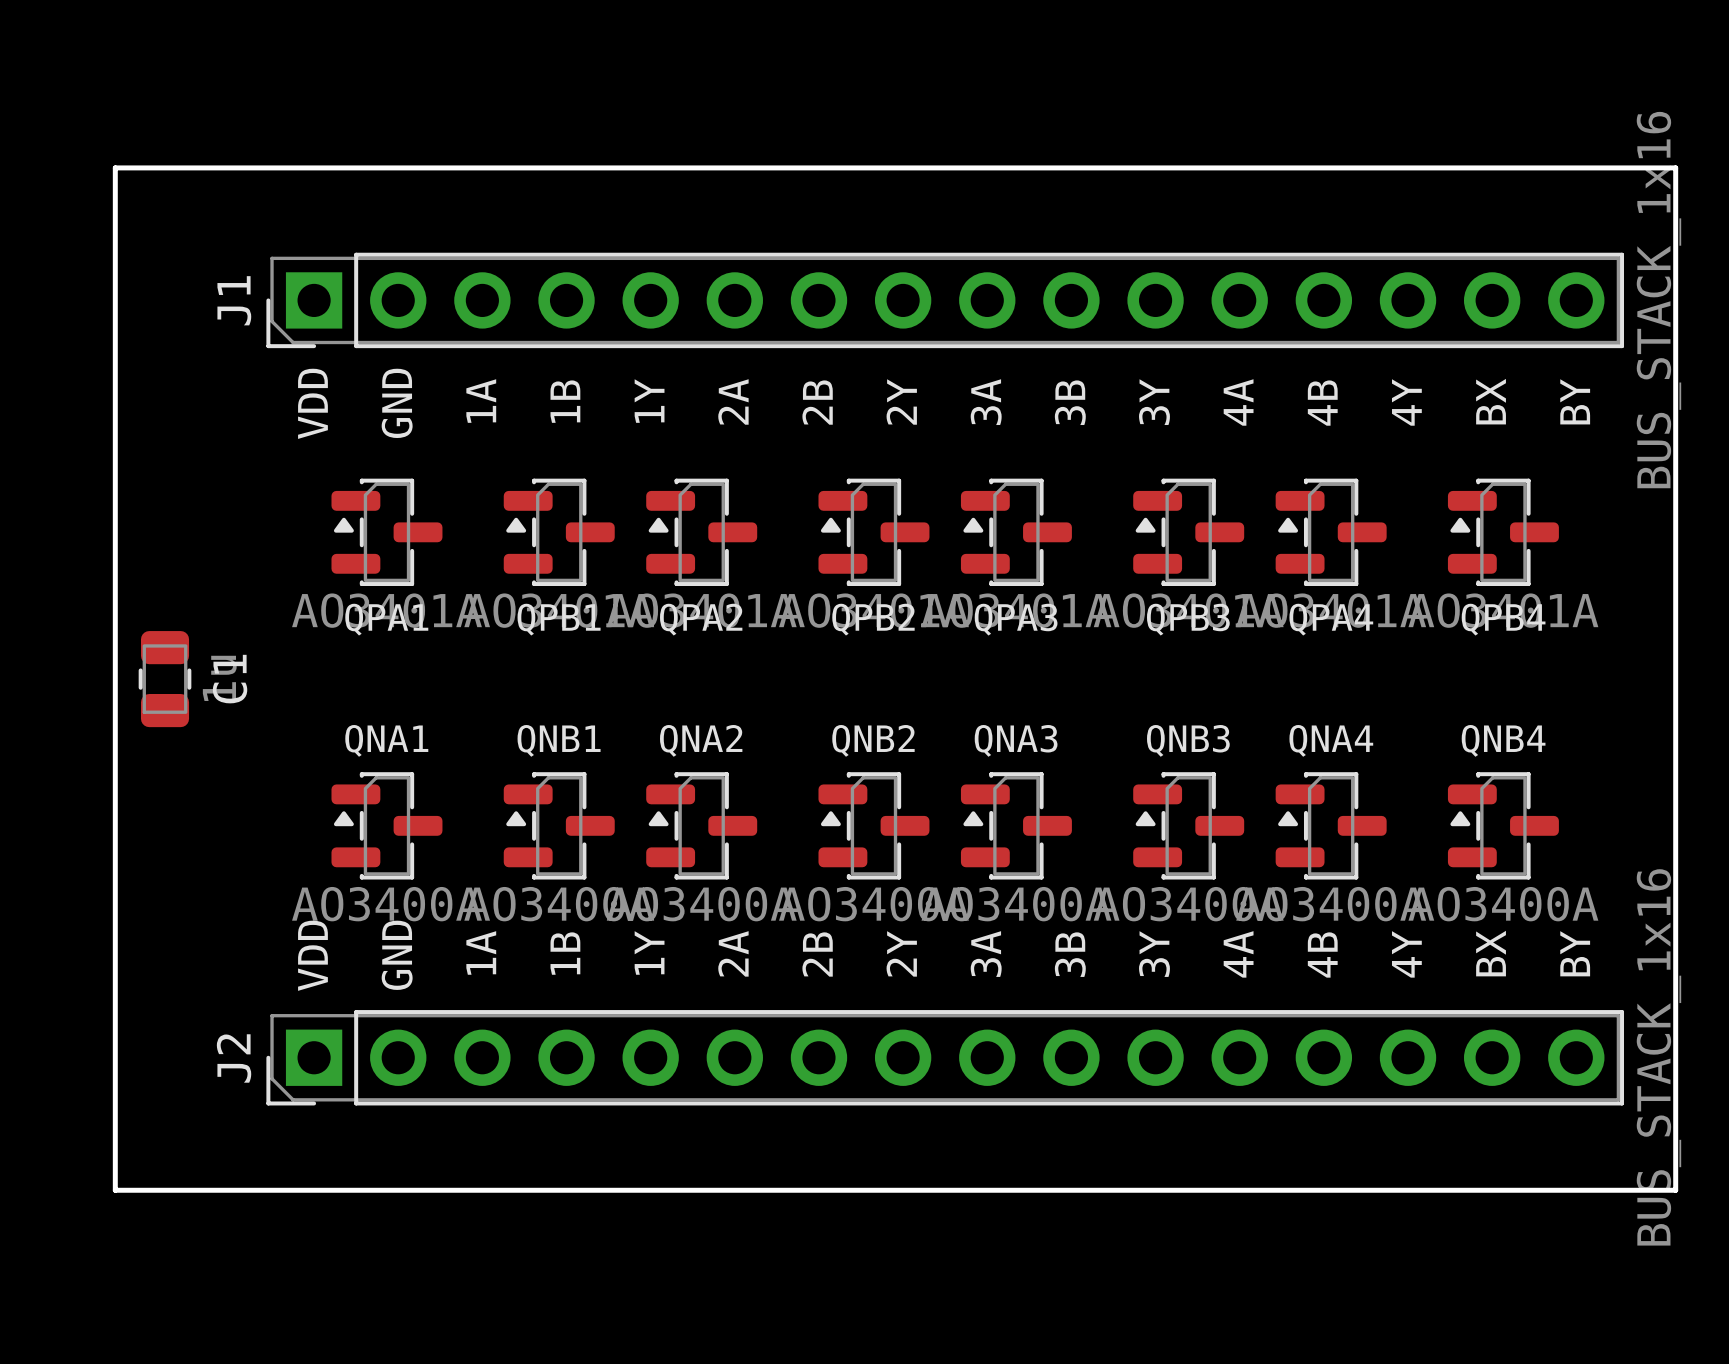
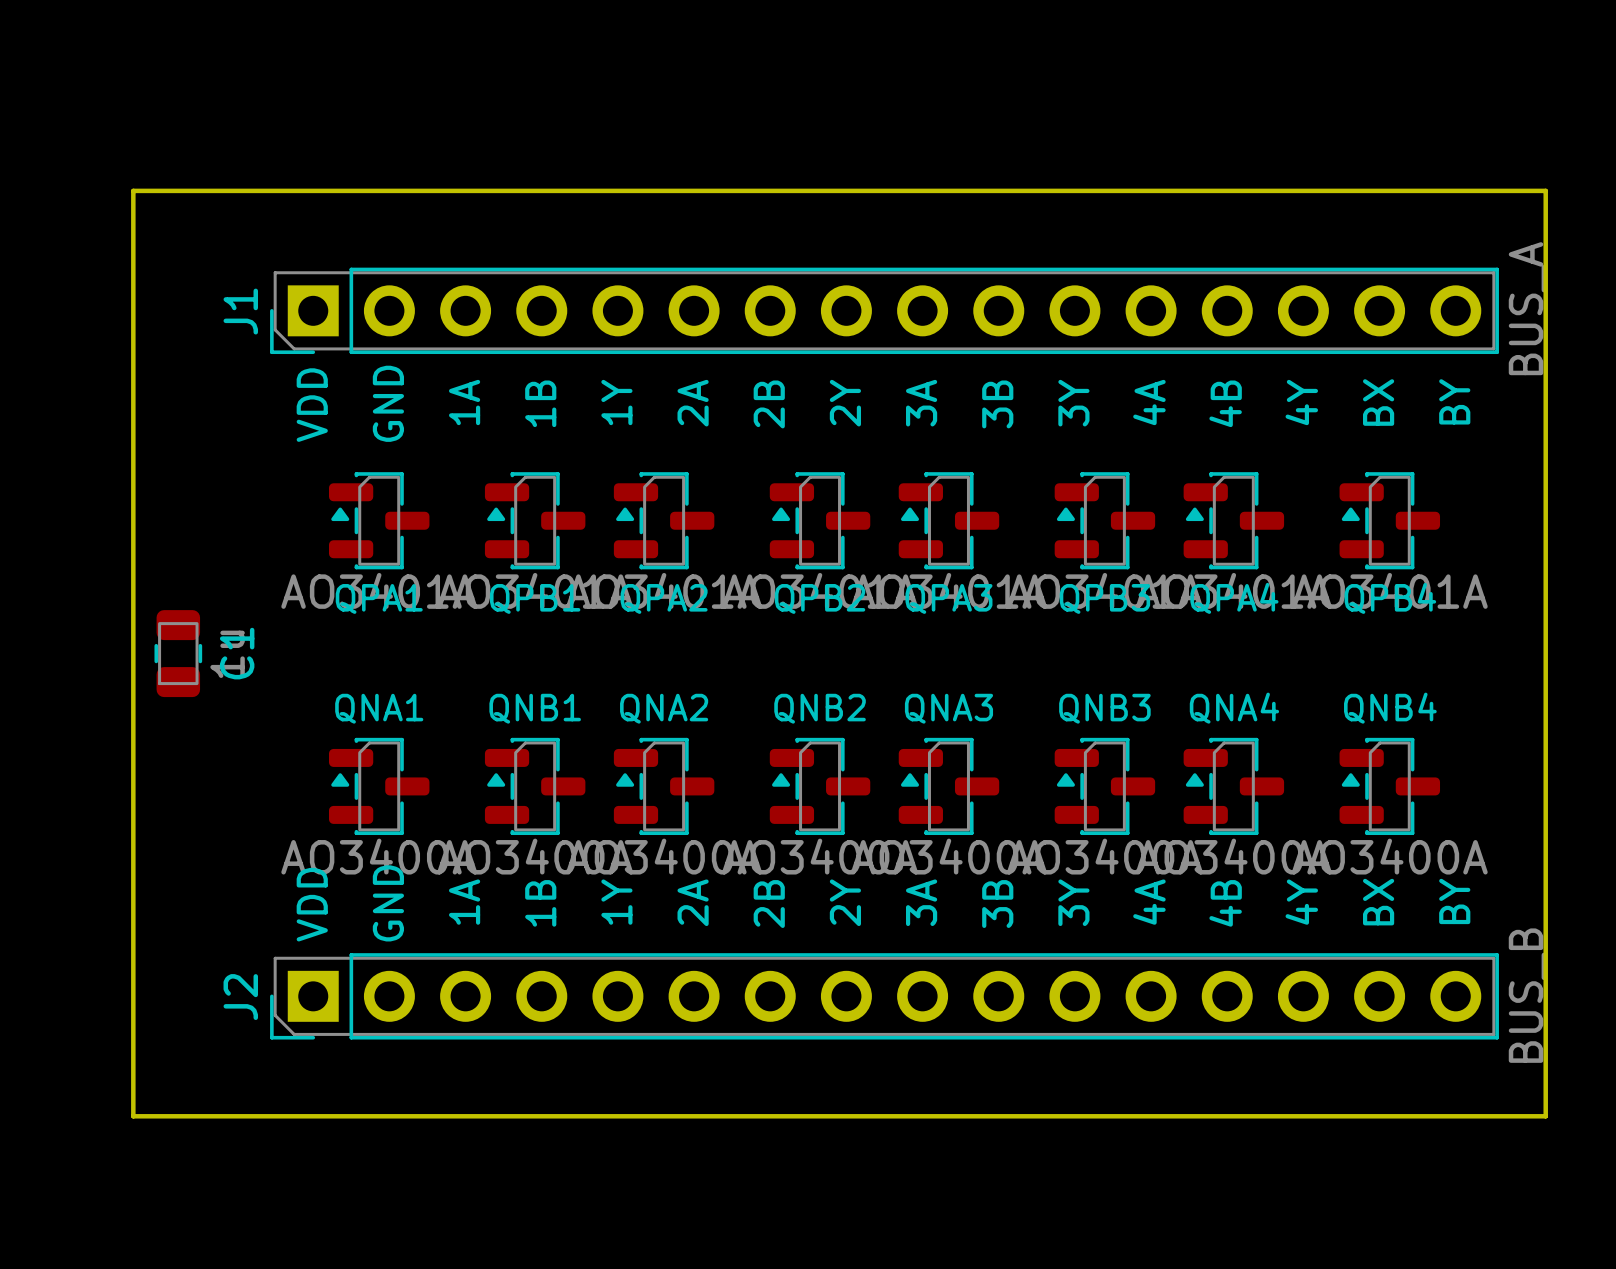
J1 value: BUS_STACK_1x16 (1658, 300) -> BUS_A (1527, 308)
J2 value: BUS_STACK_1x16 (1658, 1057) -> BUS_B (1527, 995)

